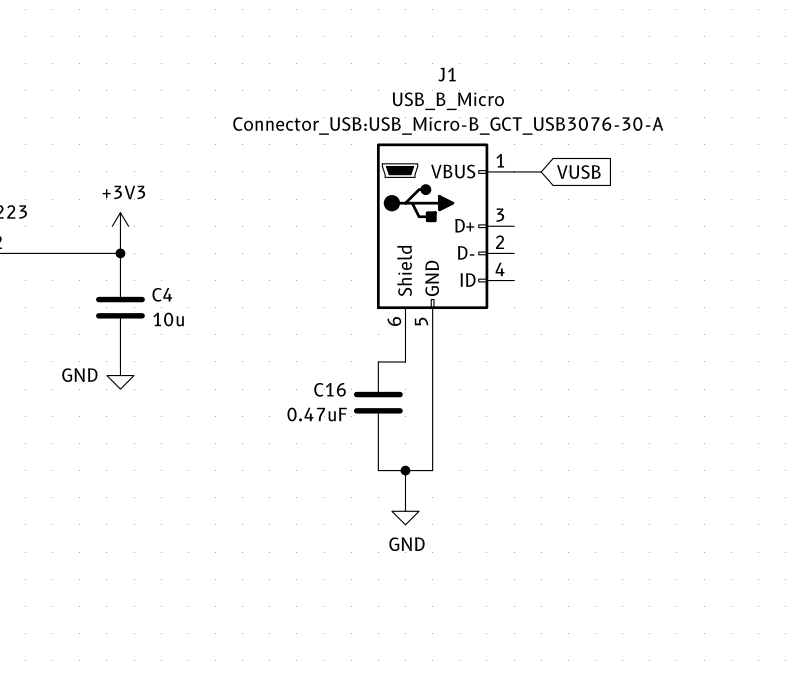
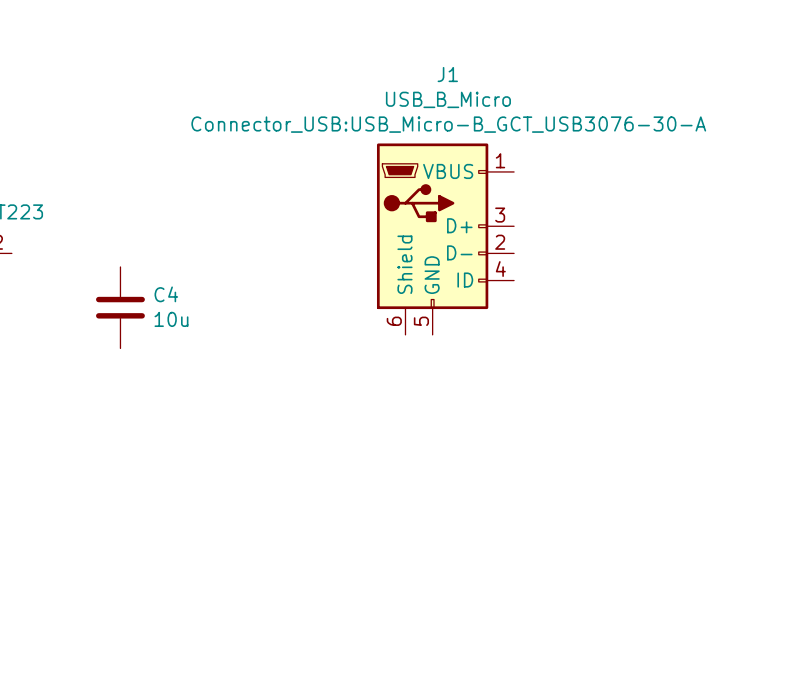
wire: (514, 171) (541, 171) -> none
global label: VUSB (578, 172) -> none
power symbol: +3V3 (120, 226) -> none
wire: (120, 239) (120, 266) -> none
wire: (11, 253) (120, 253) -> none
junction: (120, 253) -> none
wire: (405, 334) (405, 361) (378, 361) -> none
wire: (432, 334) (432, 470) (378, 470) (378, 443) -> none
wire: (120, 348) (120, 361) -> none
power symbol: GND (120, 375) -> none
C16: 0.47uF (378, 402) -> none
wire: (405, 470) (405, 497) -> none
junction: (405, 470) -> none
power symbol: GND (405, 511) -> none

